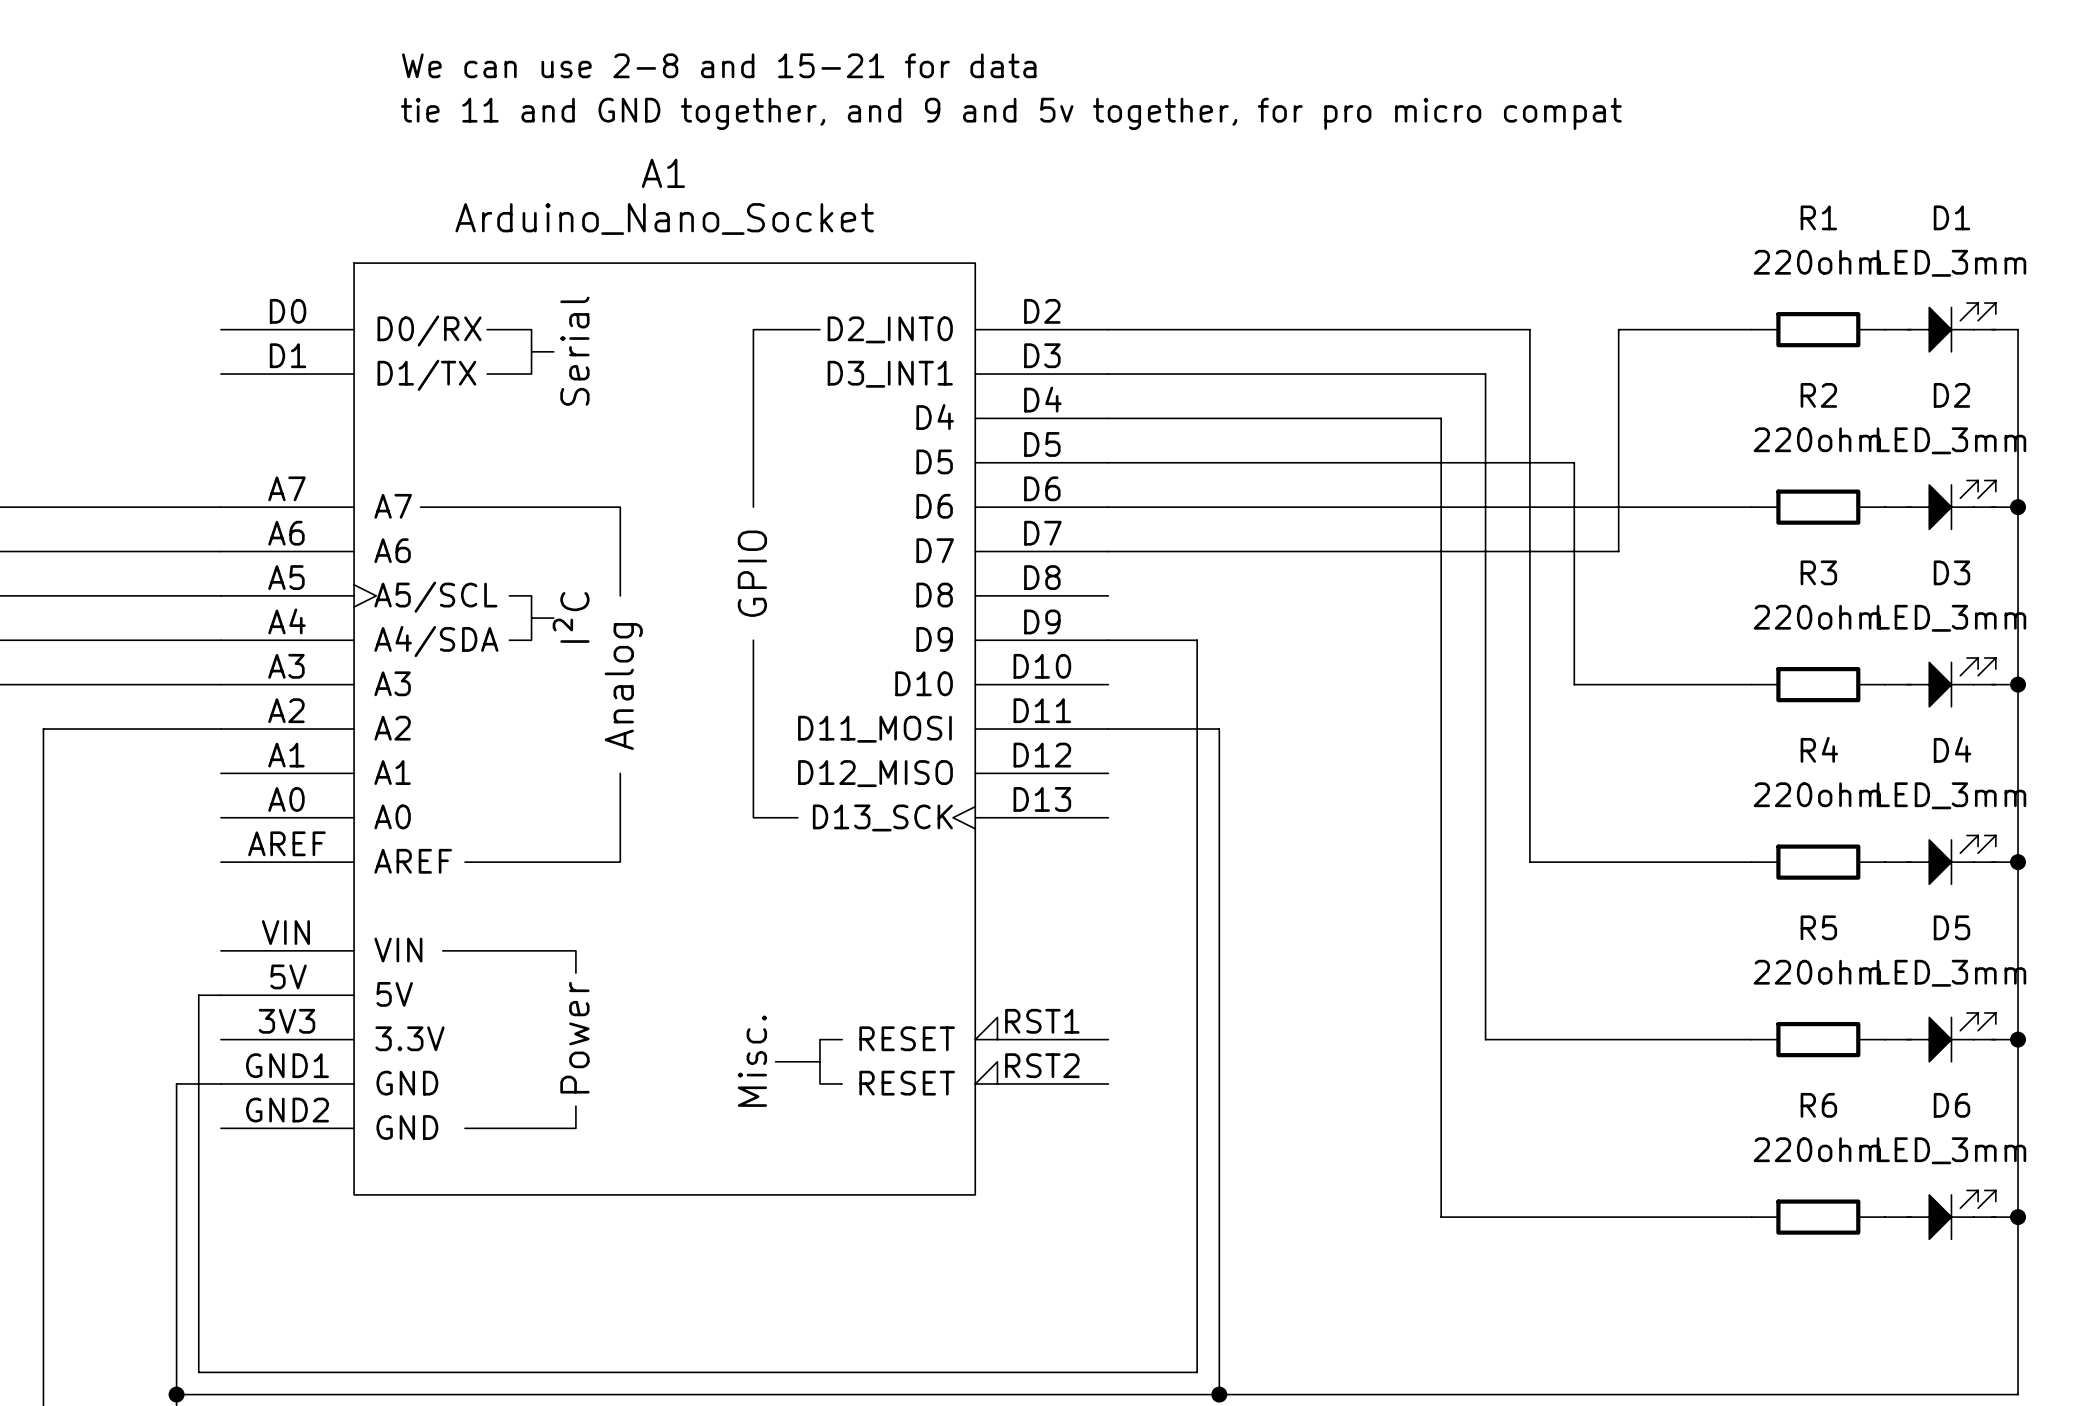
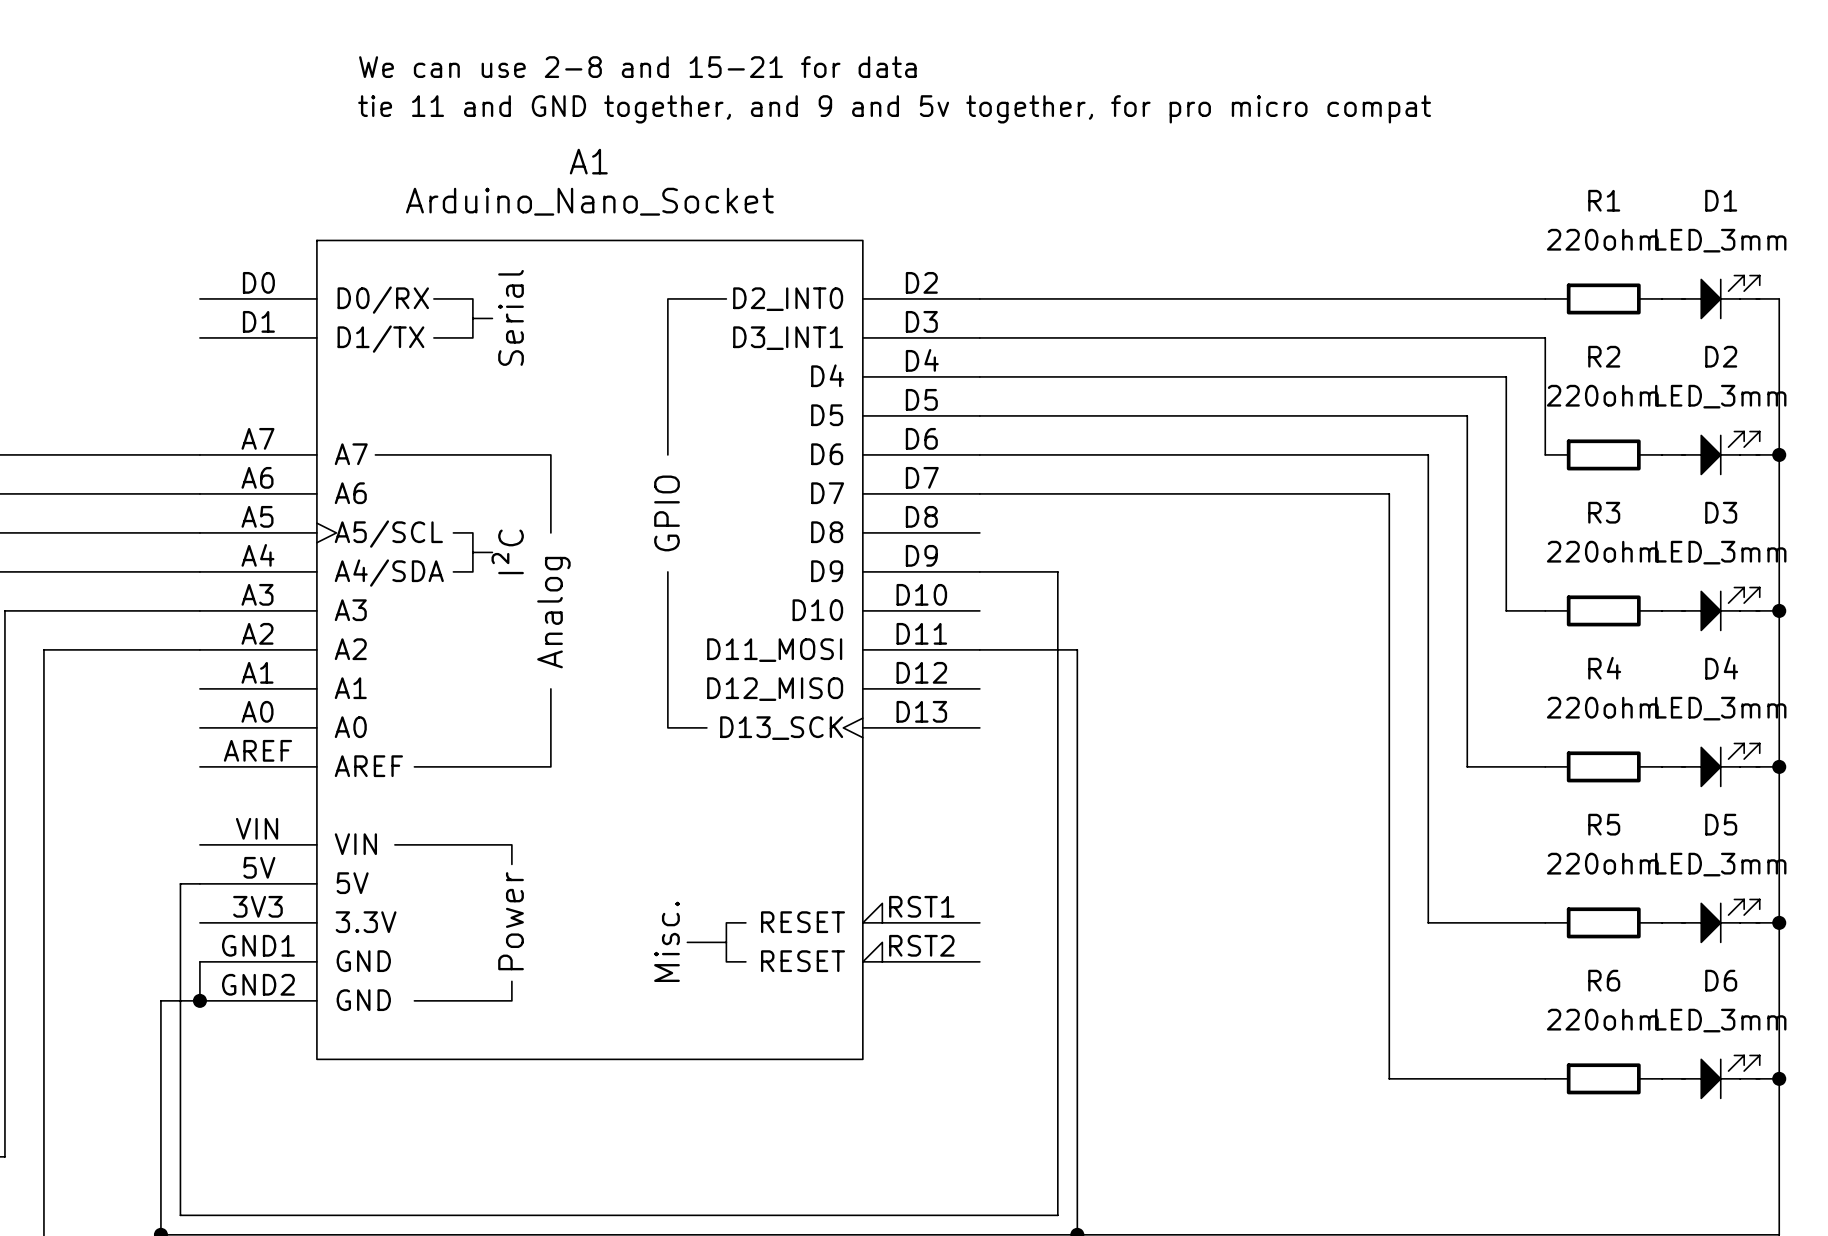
wire: (1529, 329) (1529, 862) (1663, 862) -> (1389, 415) (1467, 415) (1467, 766)
wire: none -> (1350, 298) (1428, 298)
wire: (1618, 329) (1618, 507) (1751, 507) -> (1311, 337) (1545, 337) (1545, 454)
wire: (1485, 374) (1485, 1039) (1618, 1039) -> (1428, 493) (1428, 922)
wire: (1441, 418) (1441, 1217) (1574, 1217) -> (1389, 610) (1389, 1078)
wire: (1574, 462) (1574, 551) (1618, 551) -> none
wire: (1574, 684) (1707, 684) -> (1272, 376) (1506, 376) (1506, 610)
wire: (220, 1083) (176, 1083) (176, 1128) -> (199, 961) (199, 1000) (160, 1000)
junction: none -> (199, 1000)

